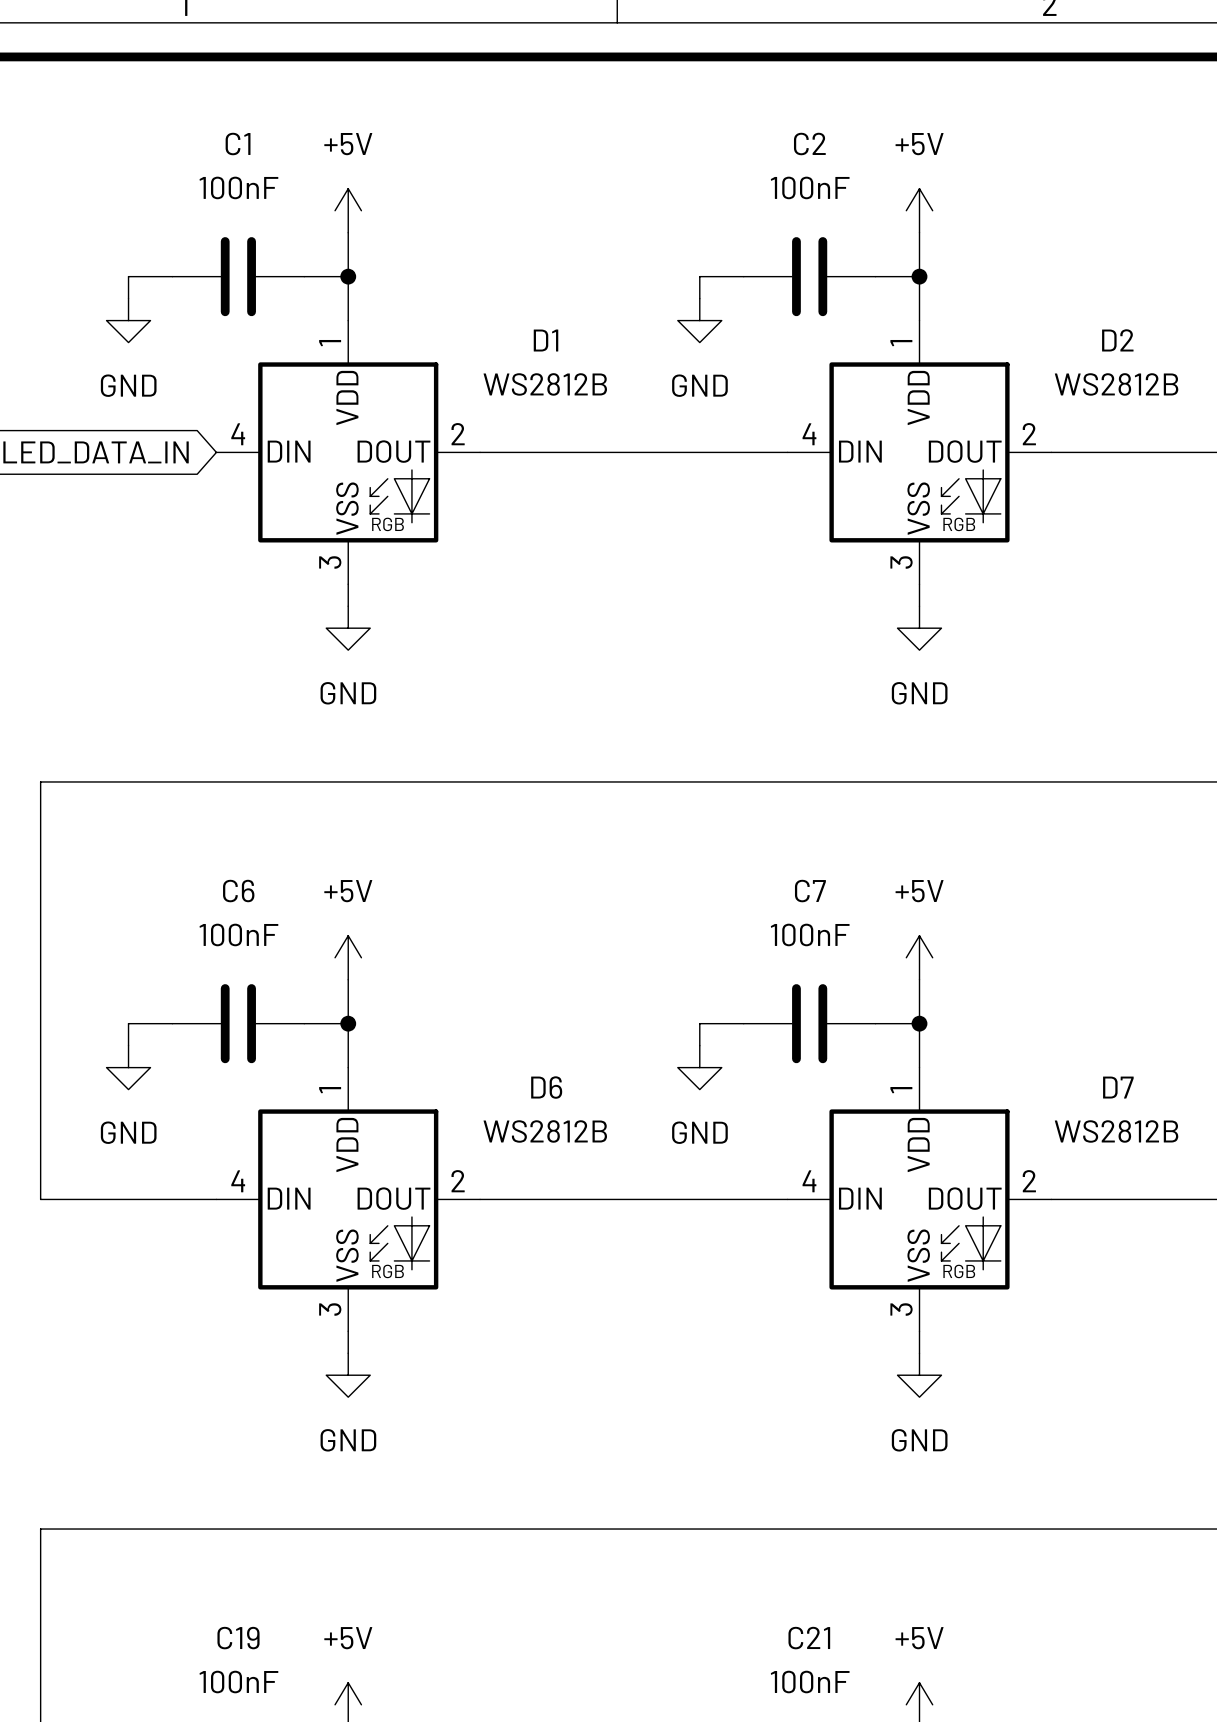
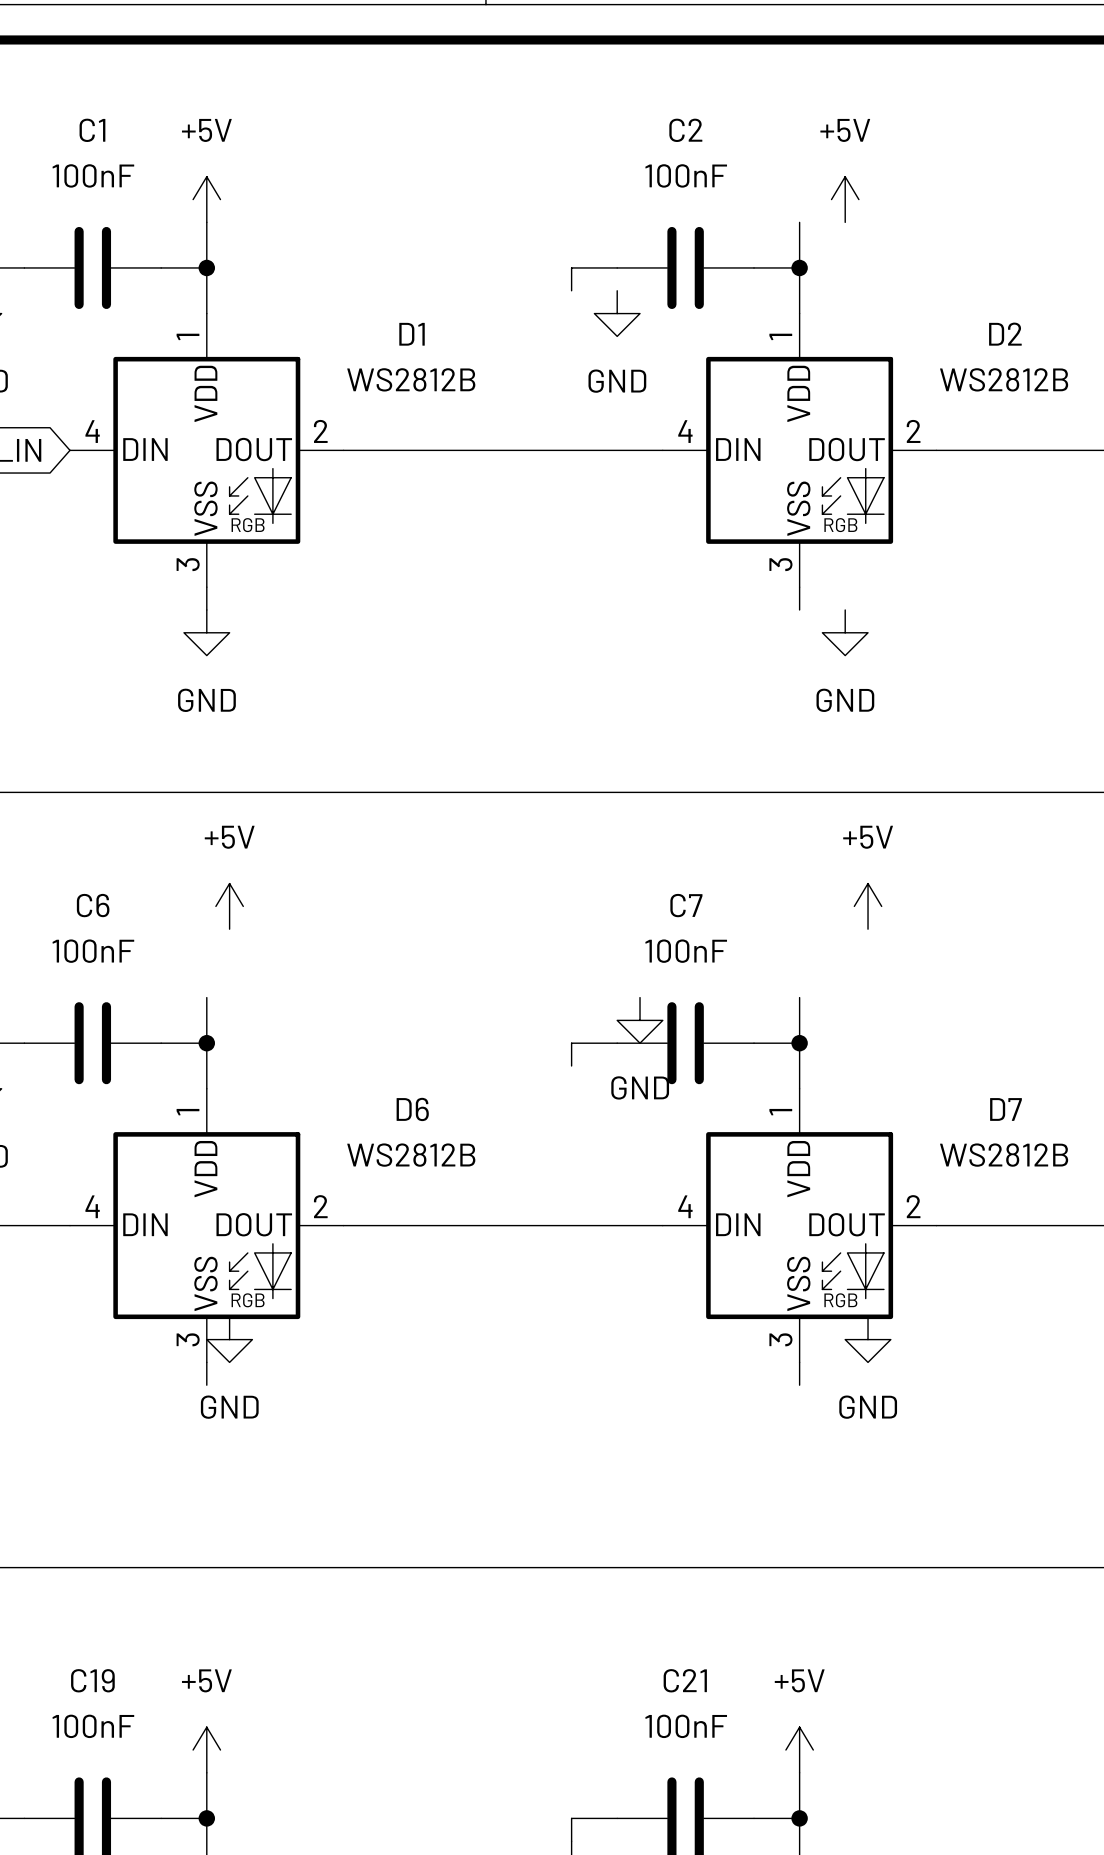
power symbol position: +5V (919, 210) -> +5V (845, 199)
power symbol position: GND (699, 320) -> GND (617, 313)
power symbol position: GND (919, 628) -> GND (845, 632)
power symbol position: +5V (348, 957) -> +5V (229, 906)
power symbol position: +5V (919, 957) -> +5V (868, 906)
power symbol position: GND (699, 1067) -> GND (640, 1020)
power symbol position: GND (348, 1375) -> GND (229, 1339)
power symbol position: GND (919, 1375) -> GND (868, 1339)

